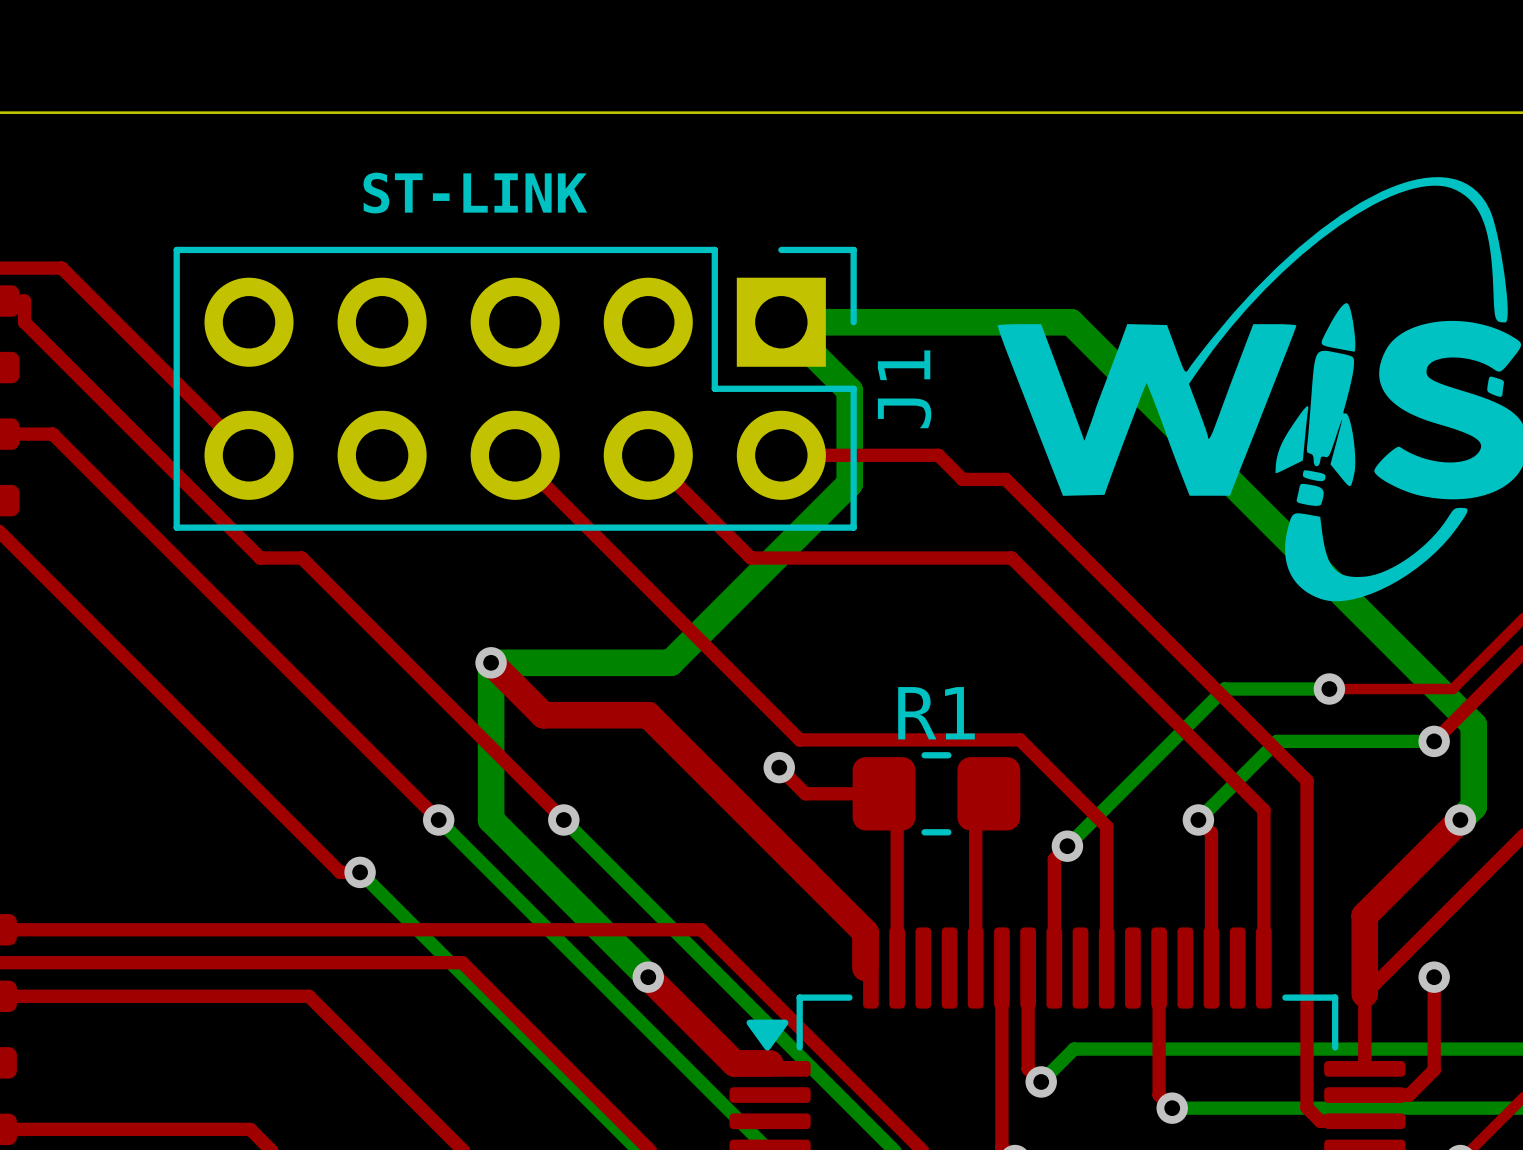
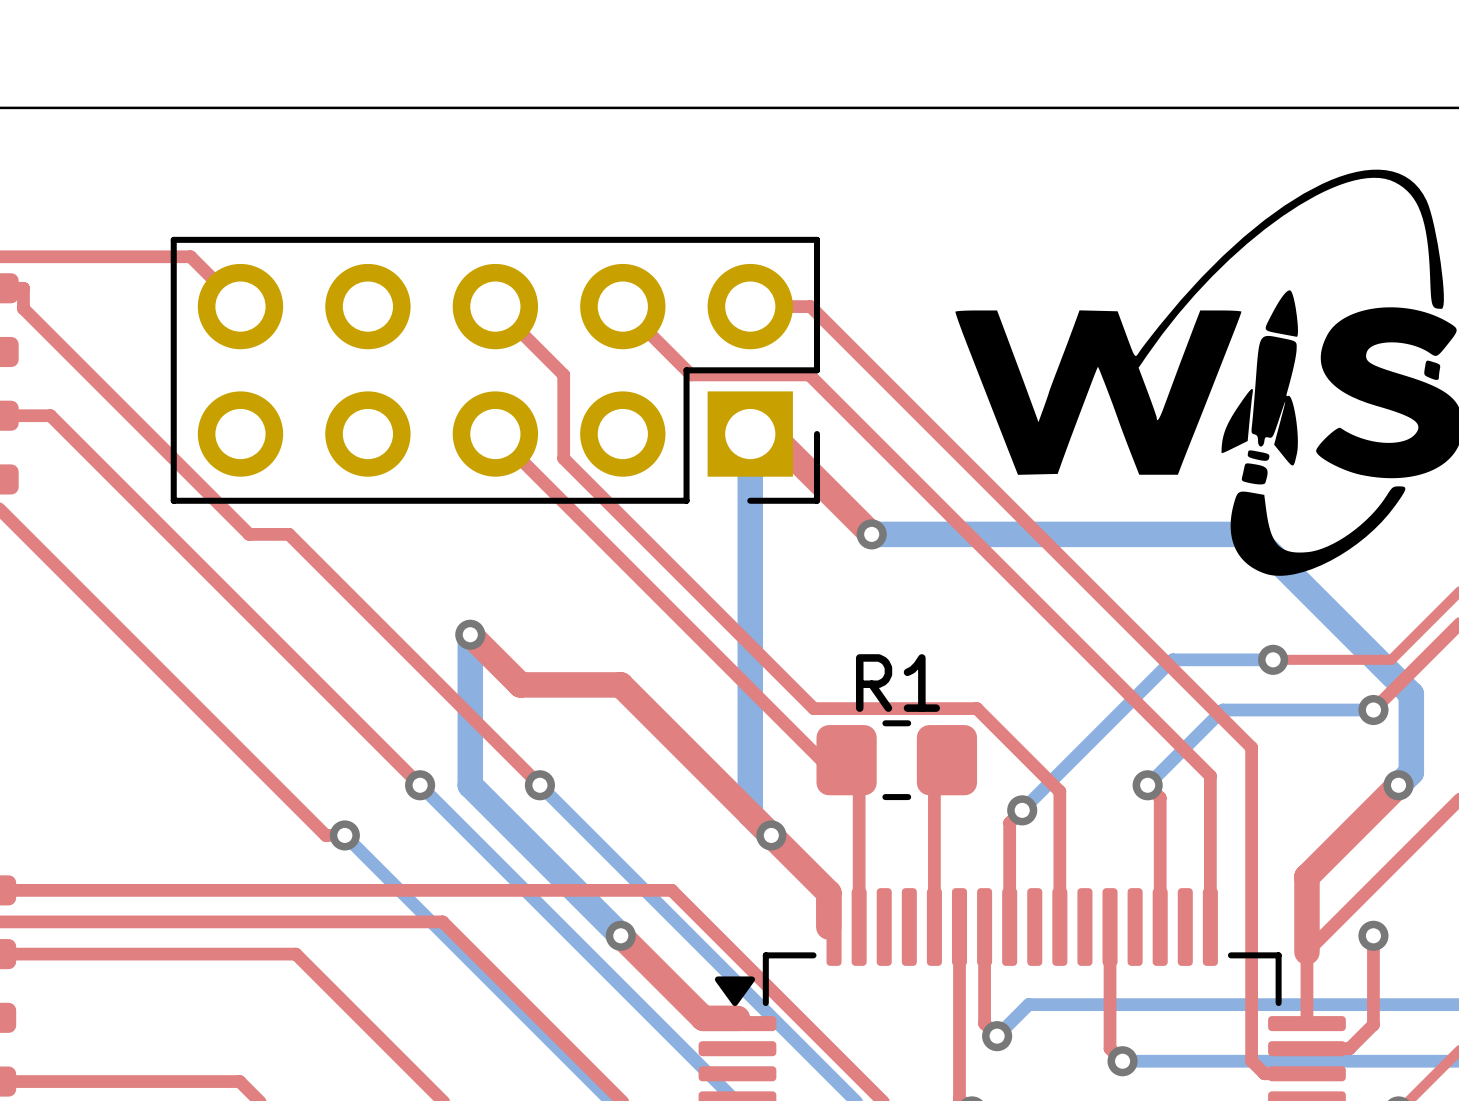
text: ST-LINK (475, 193) -> none
top track: (61, 268) (249, 455) -> (59, 256) (190, 256) (240, 306)
part: none -> (495, 370)
J1: (515, 388) -> none
bottom track: none -> (750, 434) (750, 814) (771, 835)
top track: none -> (771, 434) (871, 534)
top track: (515, 455) (799, 739) (849, 739) -> (495, 306) (563, 374) (563, 458) (813, 708)
top track: (648, 455) (750, 558) (1011, 558) -> (622, 306) (691, 374) (809, 374) (968, 534)
top track: (781, 455) (938, 455) (962, 479) (1005, 479) -> (750, 306) (810, 306) (963, 459)
via: none -> (871, 534)
bottom track: (1306, 558) (1070, 322) (781, 322) (849, 390) (849, 483) (670, 662) (491, 662) -> (1251, 534) (871, 534)
top track: (779, 767) (805, 793) (857, 793) -> (495, 434) (821, 760)
via position: (779, 767) -> (771, 835)

